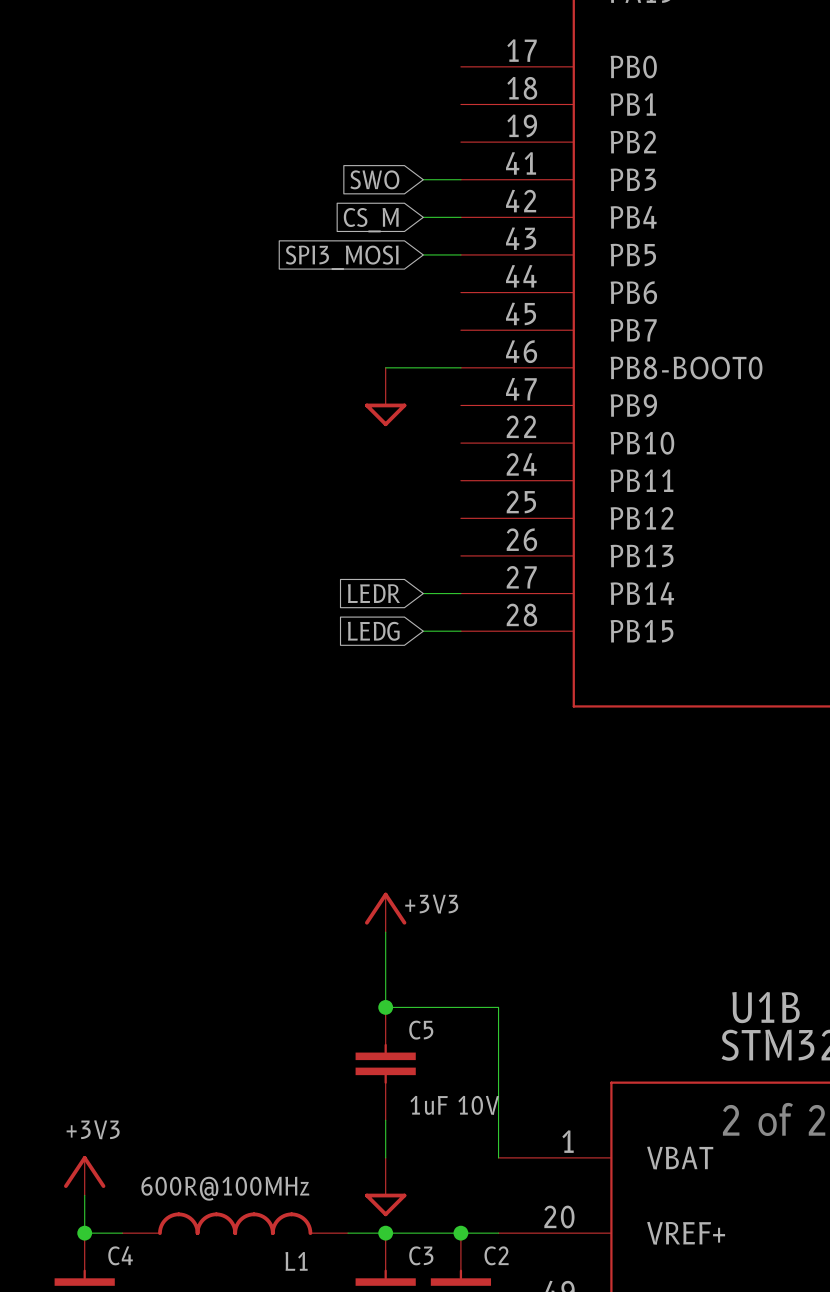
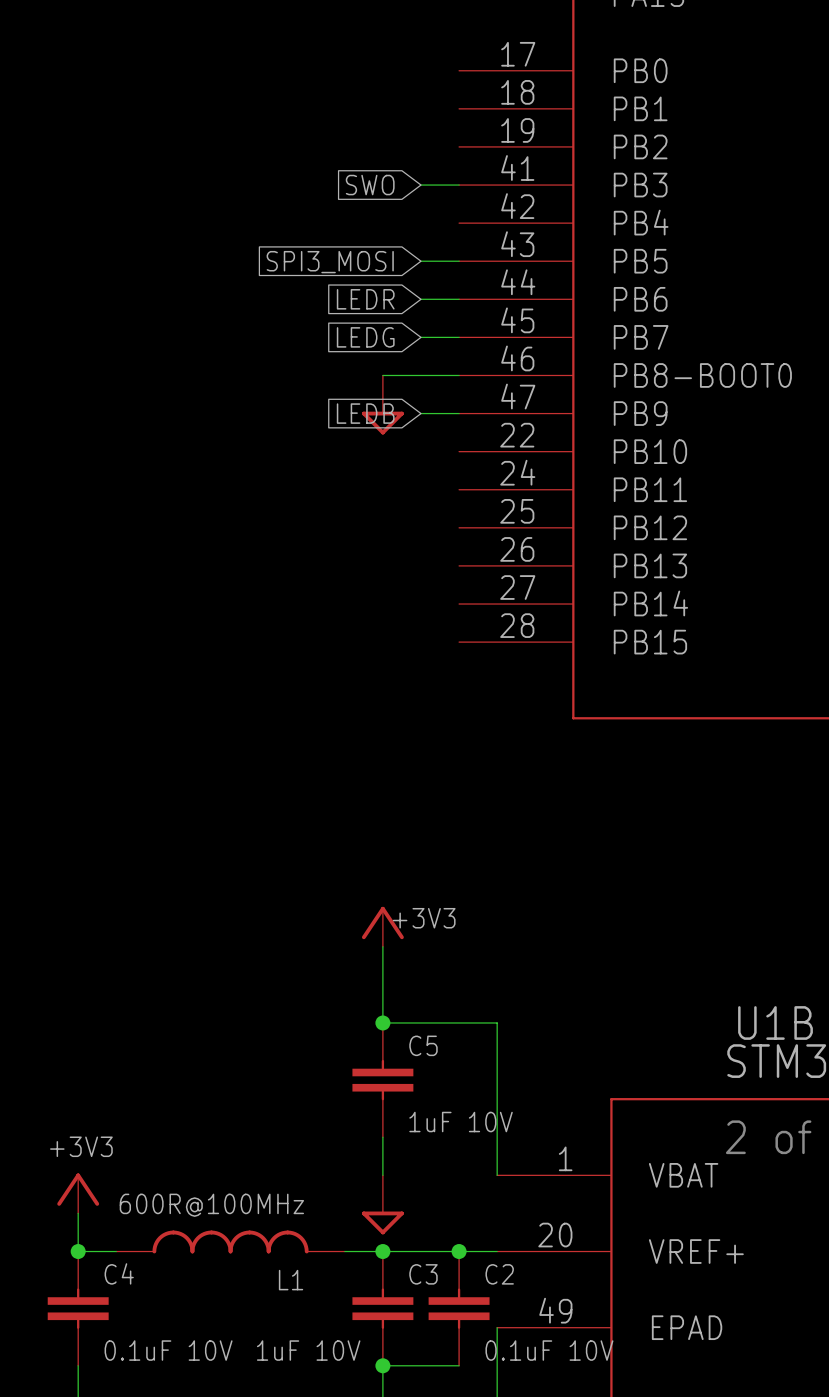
wire: (423, 217) (460, 217) -> (420, 299) (459, 299)
global label: CS_M (371, 220) -> none
global label: none -> LEDB (365, 413)
global label position: LEDR (373, 593) -> LEDR (365, 299)
wire: (423, 593) (460, 593) -> (420, 413) (459, 413)
global label position: LEDG (373, 631) -> LEDG (365, 337)
wire: (423, 631) (460, 631) -> (420, 337) (459, 337)

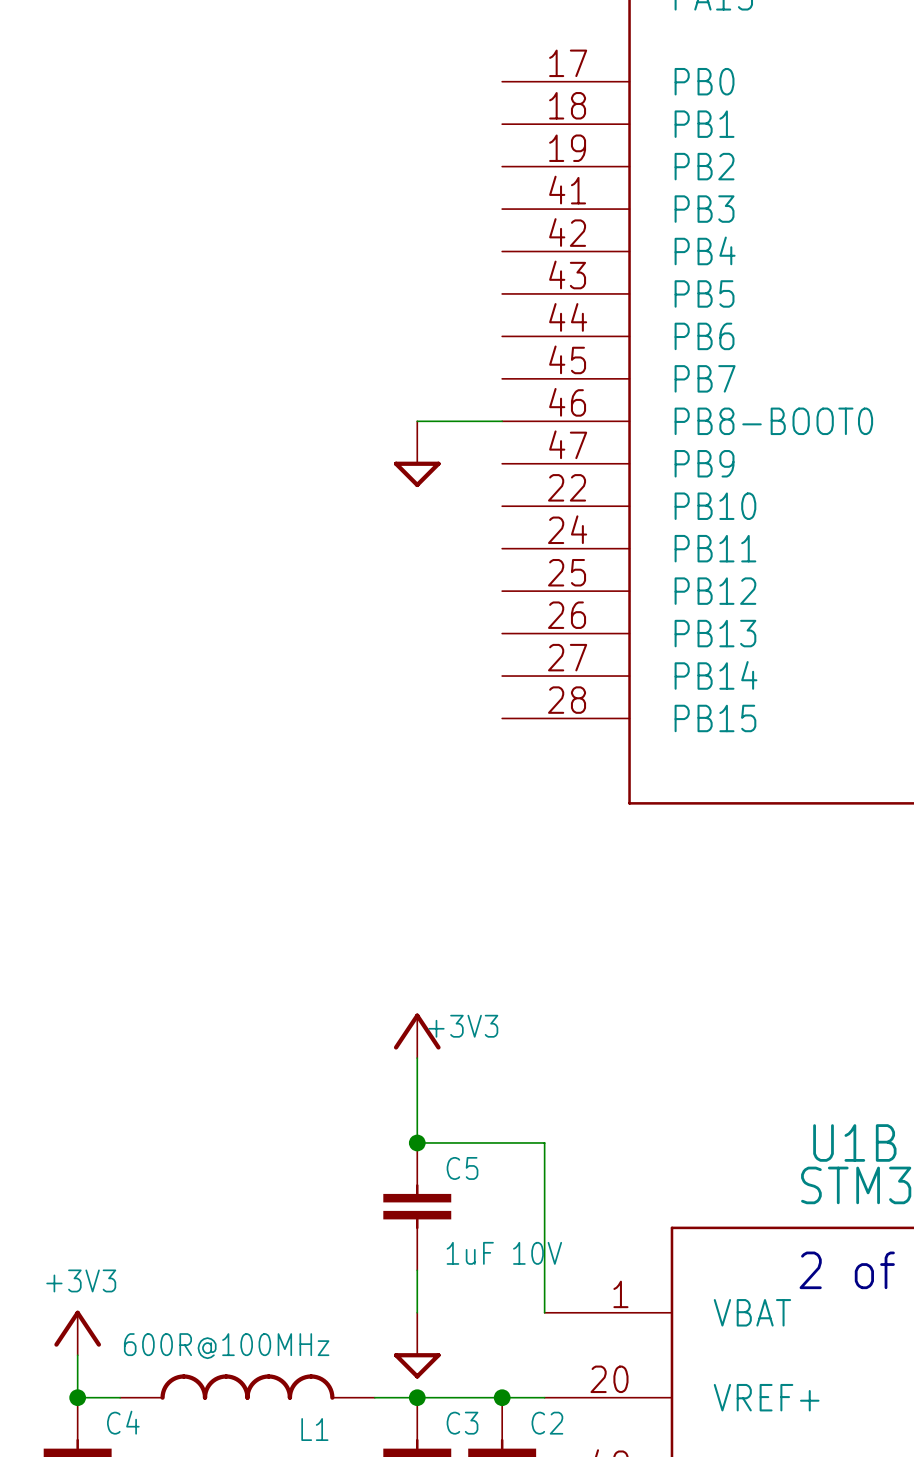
global label: SWO (370, 185) -> none
wire: (420, 185) (459, 185) -> none
wire: (420, 261) (459, 261) -> none
global label: SPI3_MOSI (330, 262) -> none
global label: LEDR (365, 299) -> none
wire: (420, 299) (459, 299) -> none
global label: LEDG (365, 337) -> none
wire: (420, 337) (459, 337) -> none
global label: LEDB (365, 413) -> none
wire: (420, 413) (459, 413) -> none

